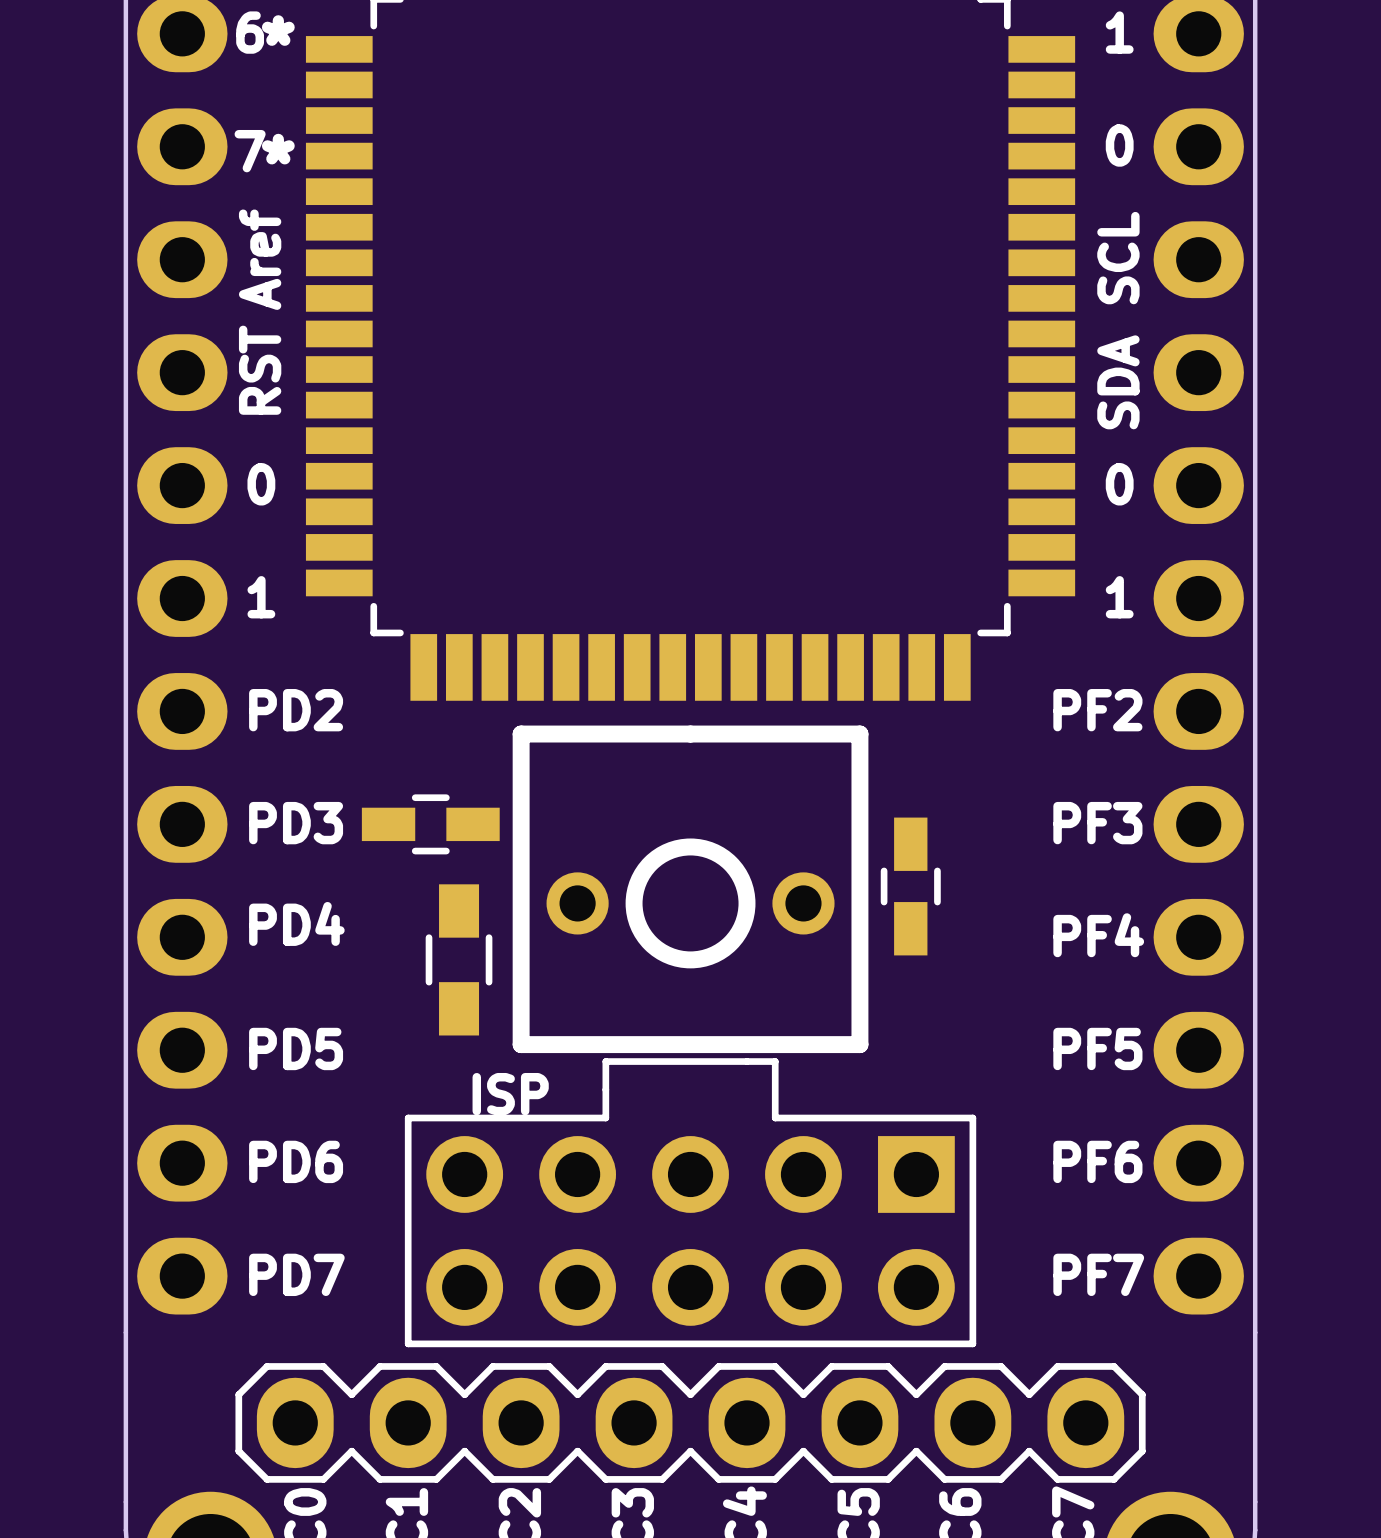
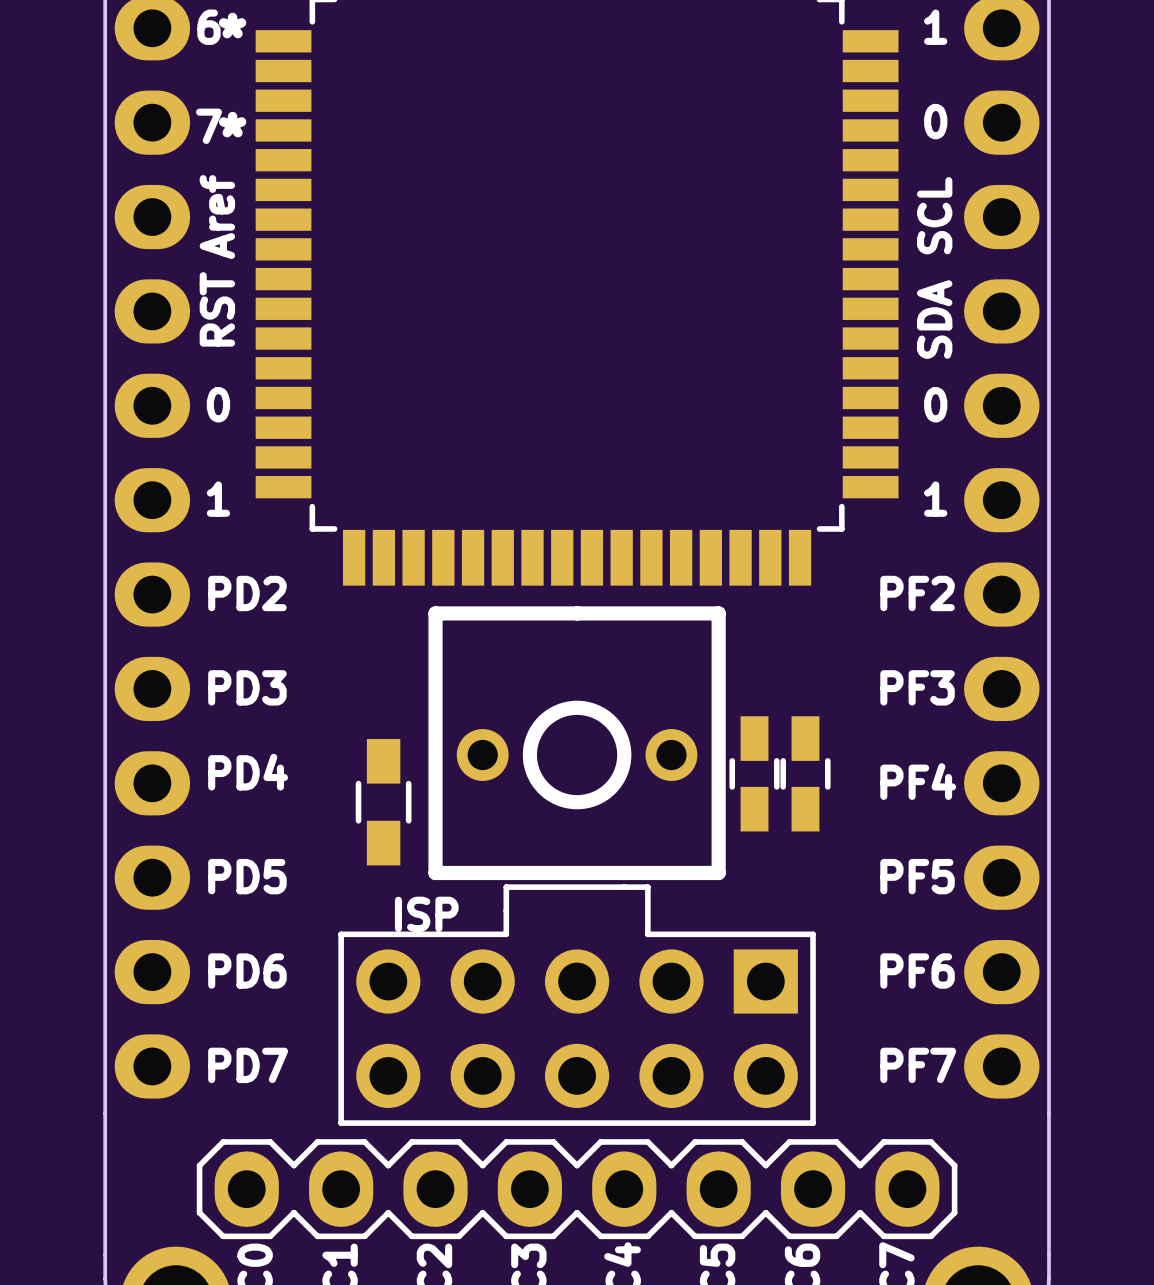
part: (430, 824) -> none
part: (910, 886) -> none
part: none -> (754, 773)
part: none -> (805, 773)

